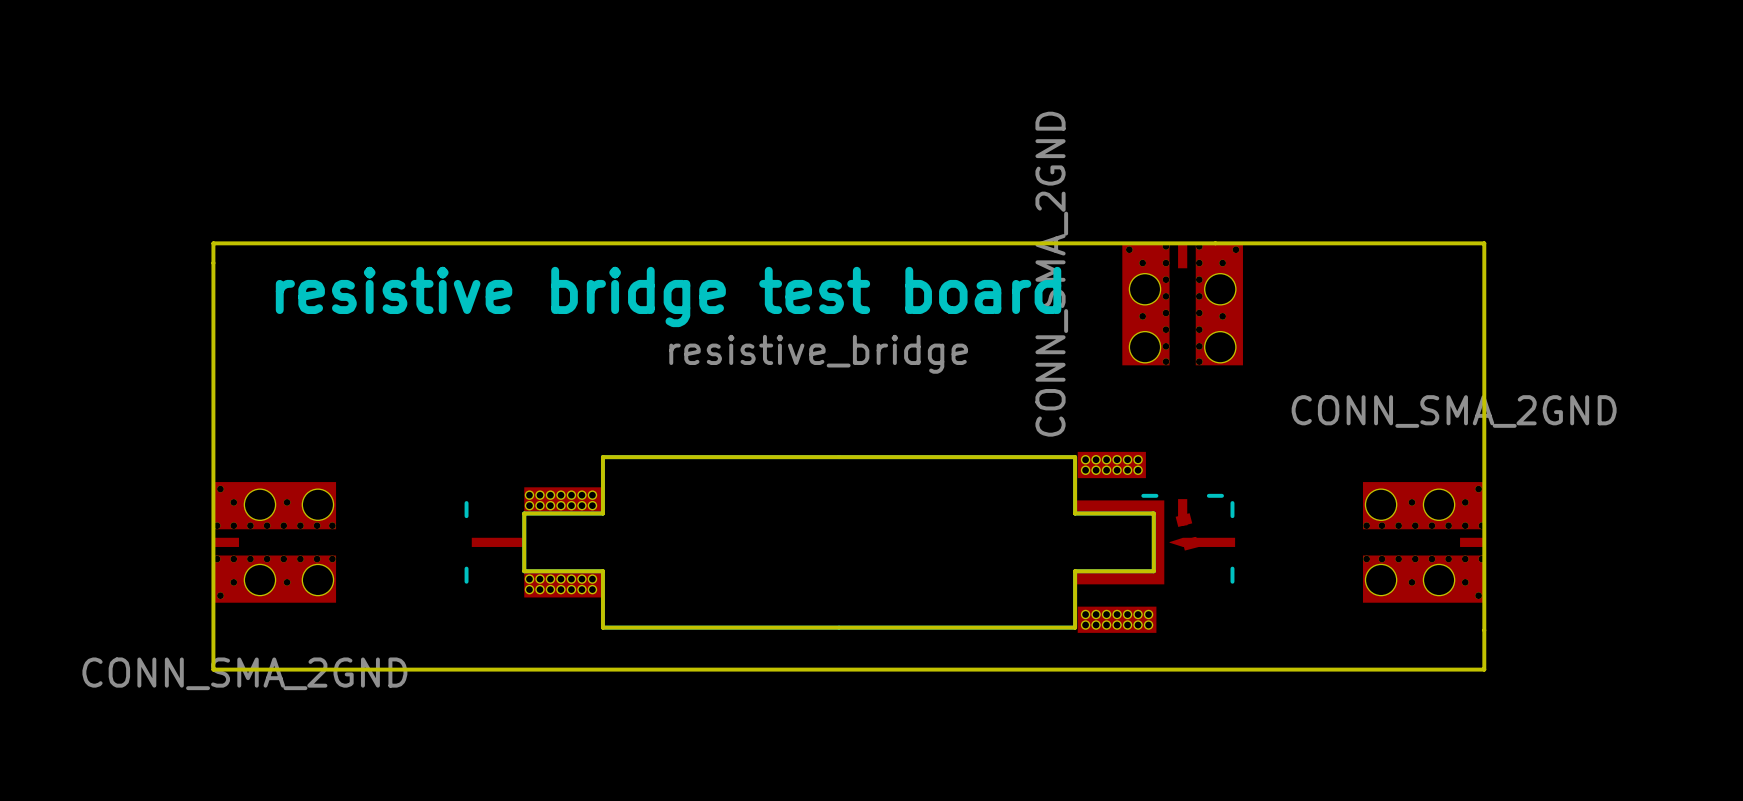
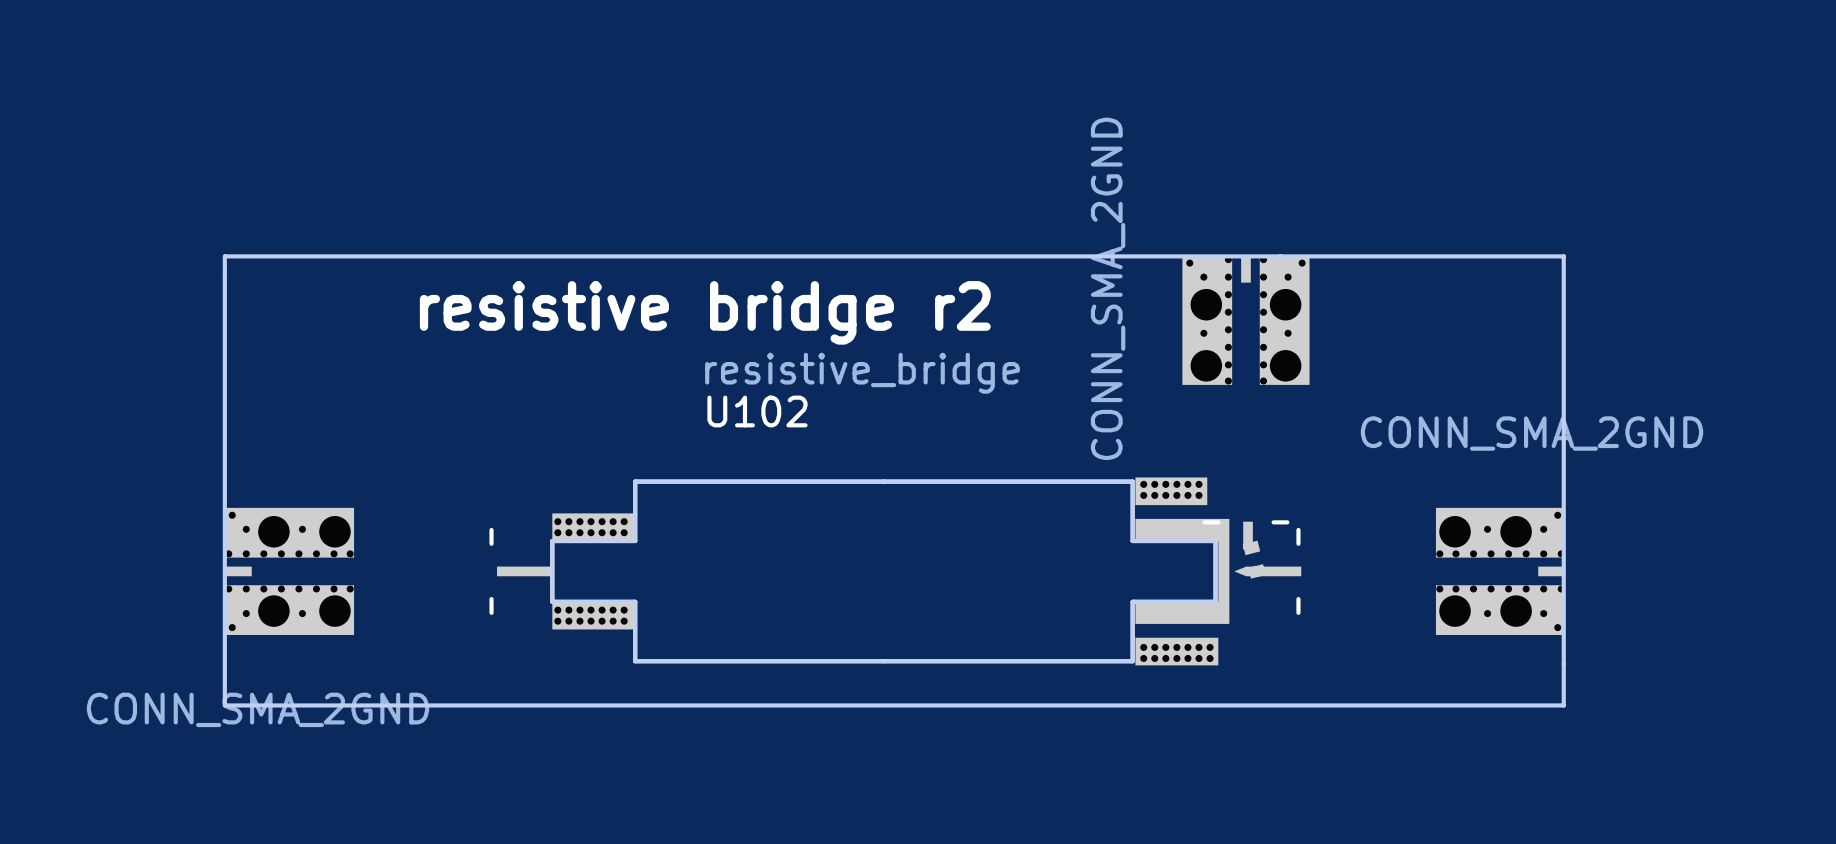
text: resistive bridge test board (668, 296) -> resistive bridge r2 (705, 312)
part: resistive_bridge (853, 542) -> none
U102: none -> resistive_bridge (899, 571)

